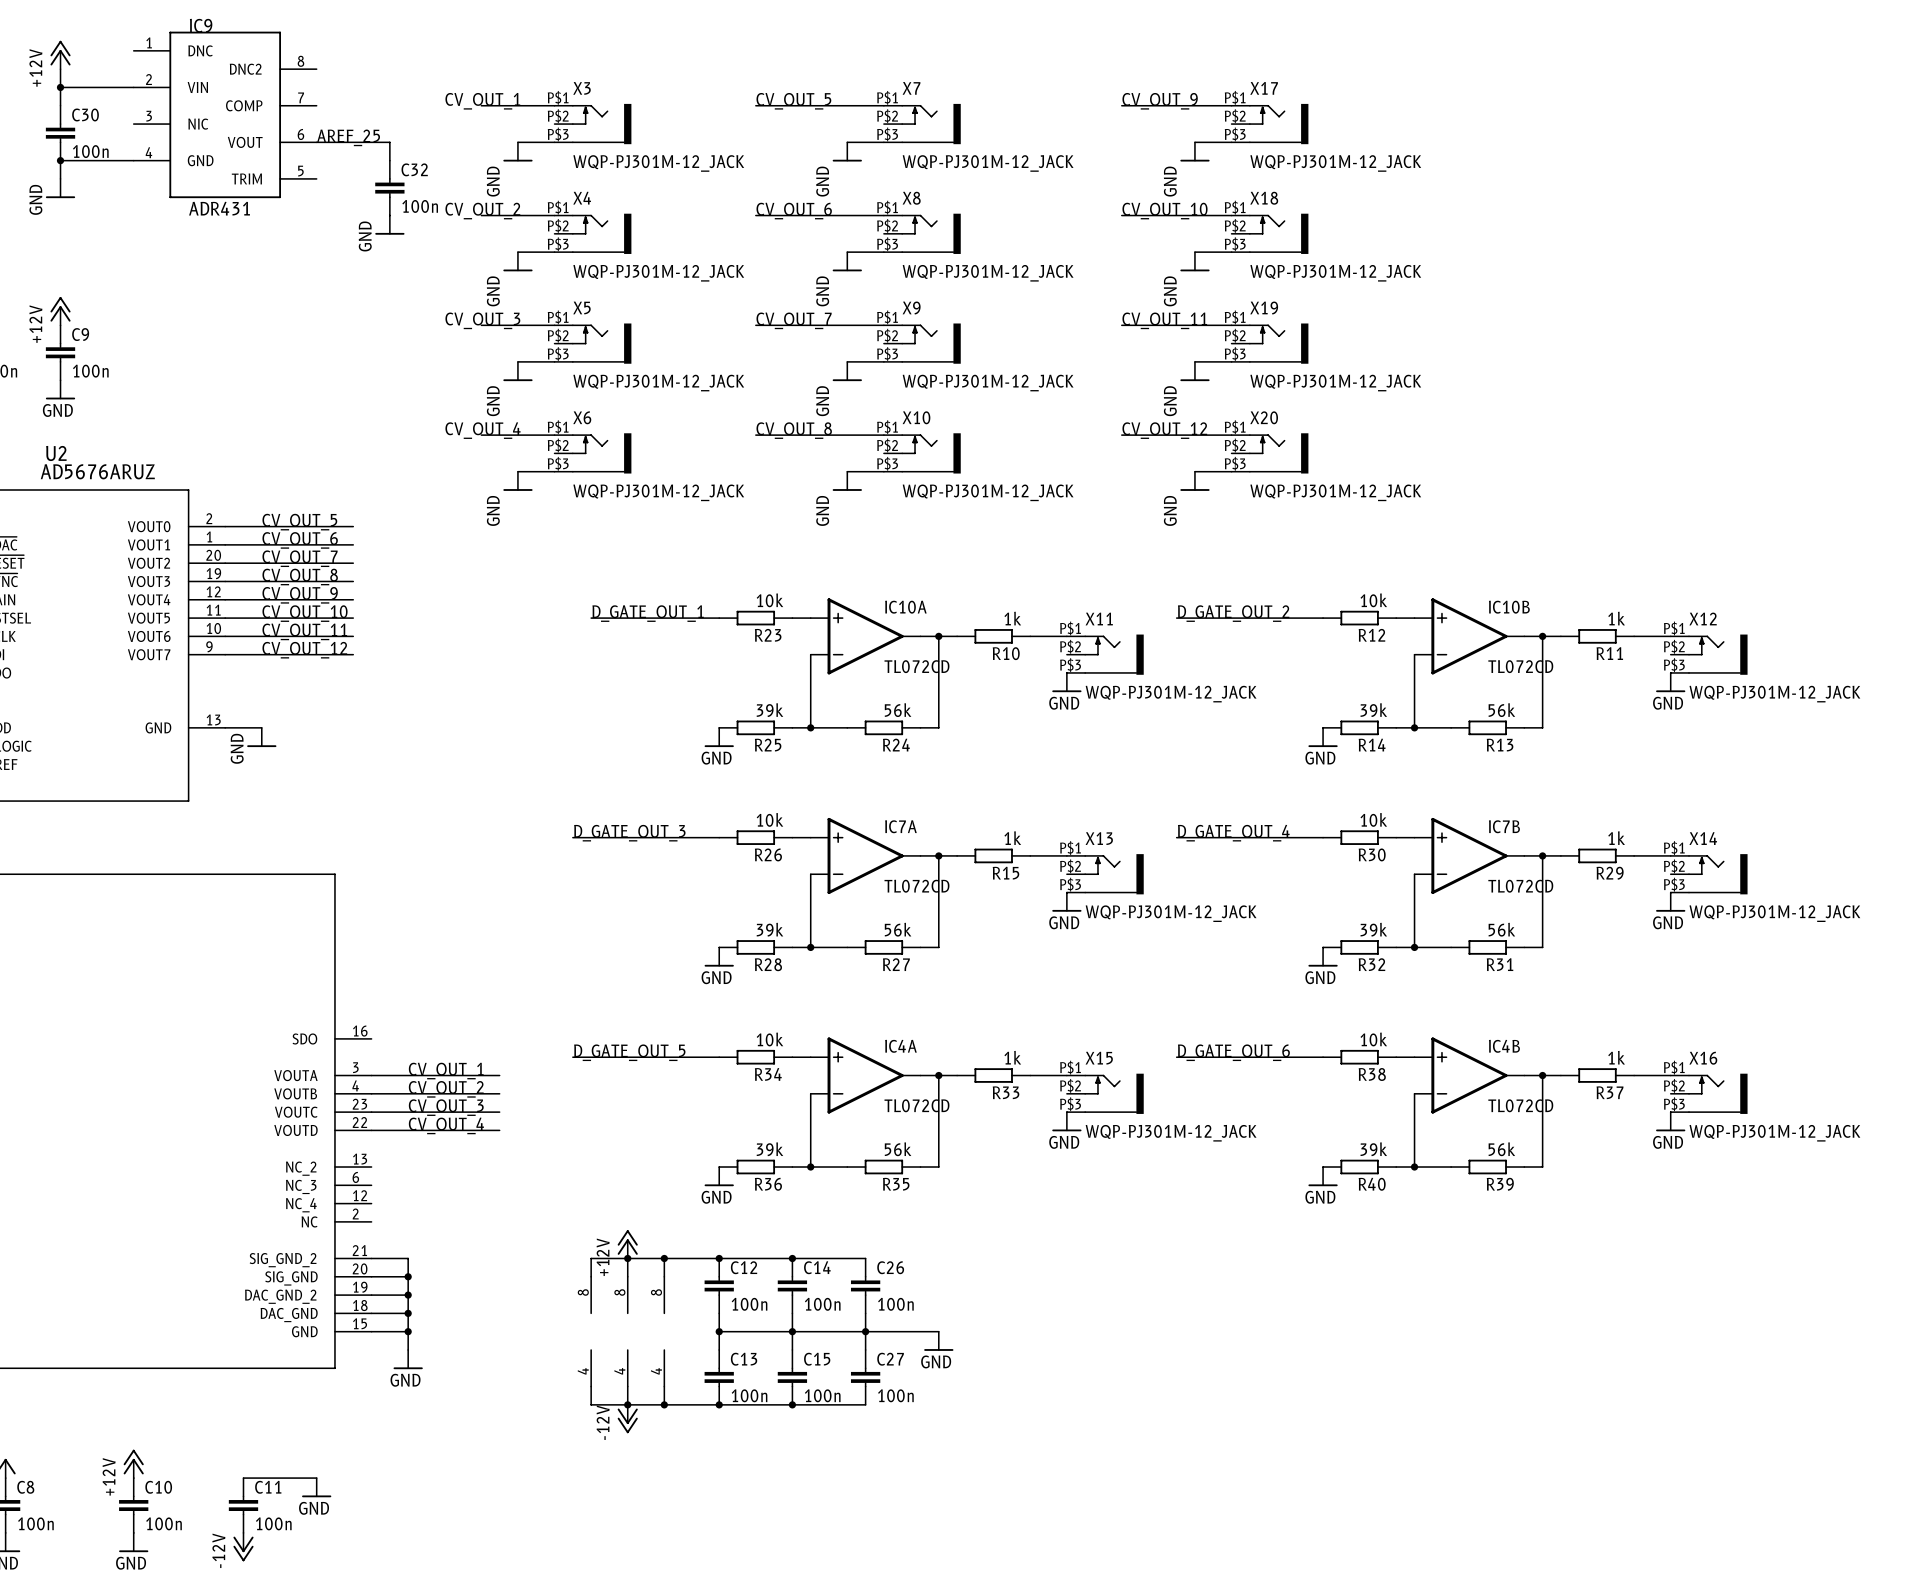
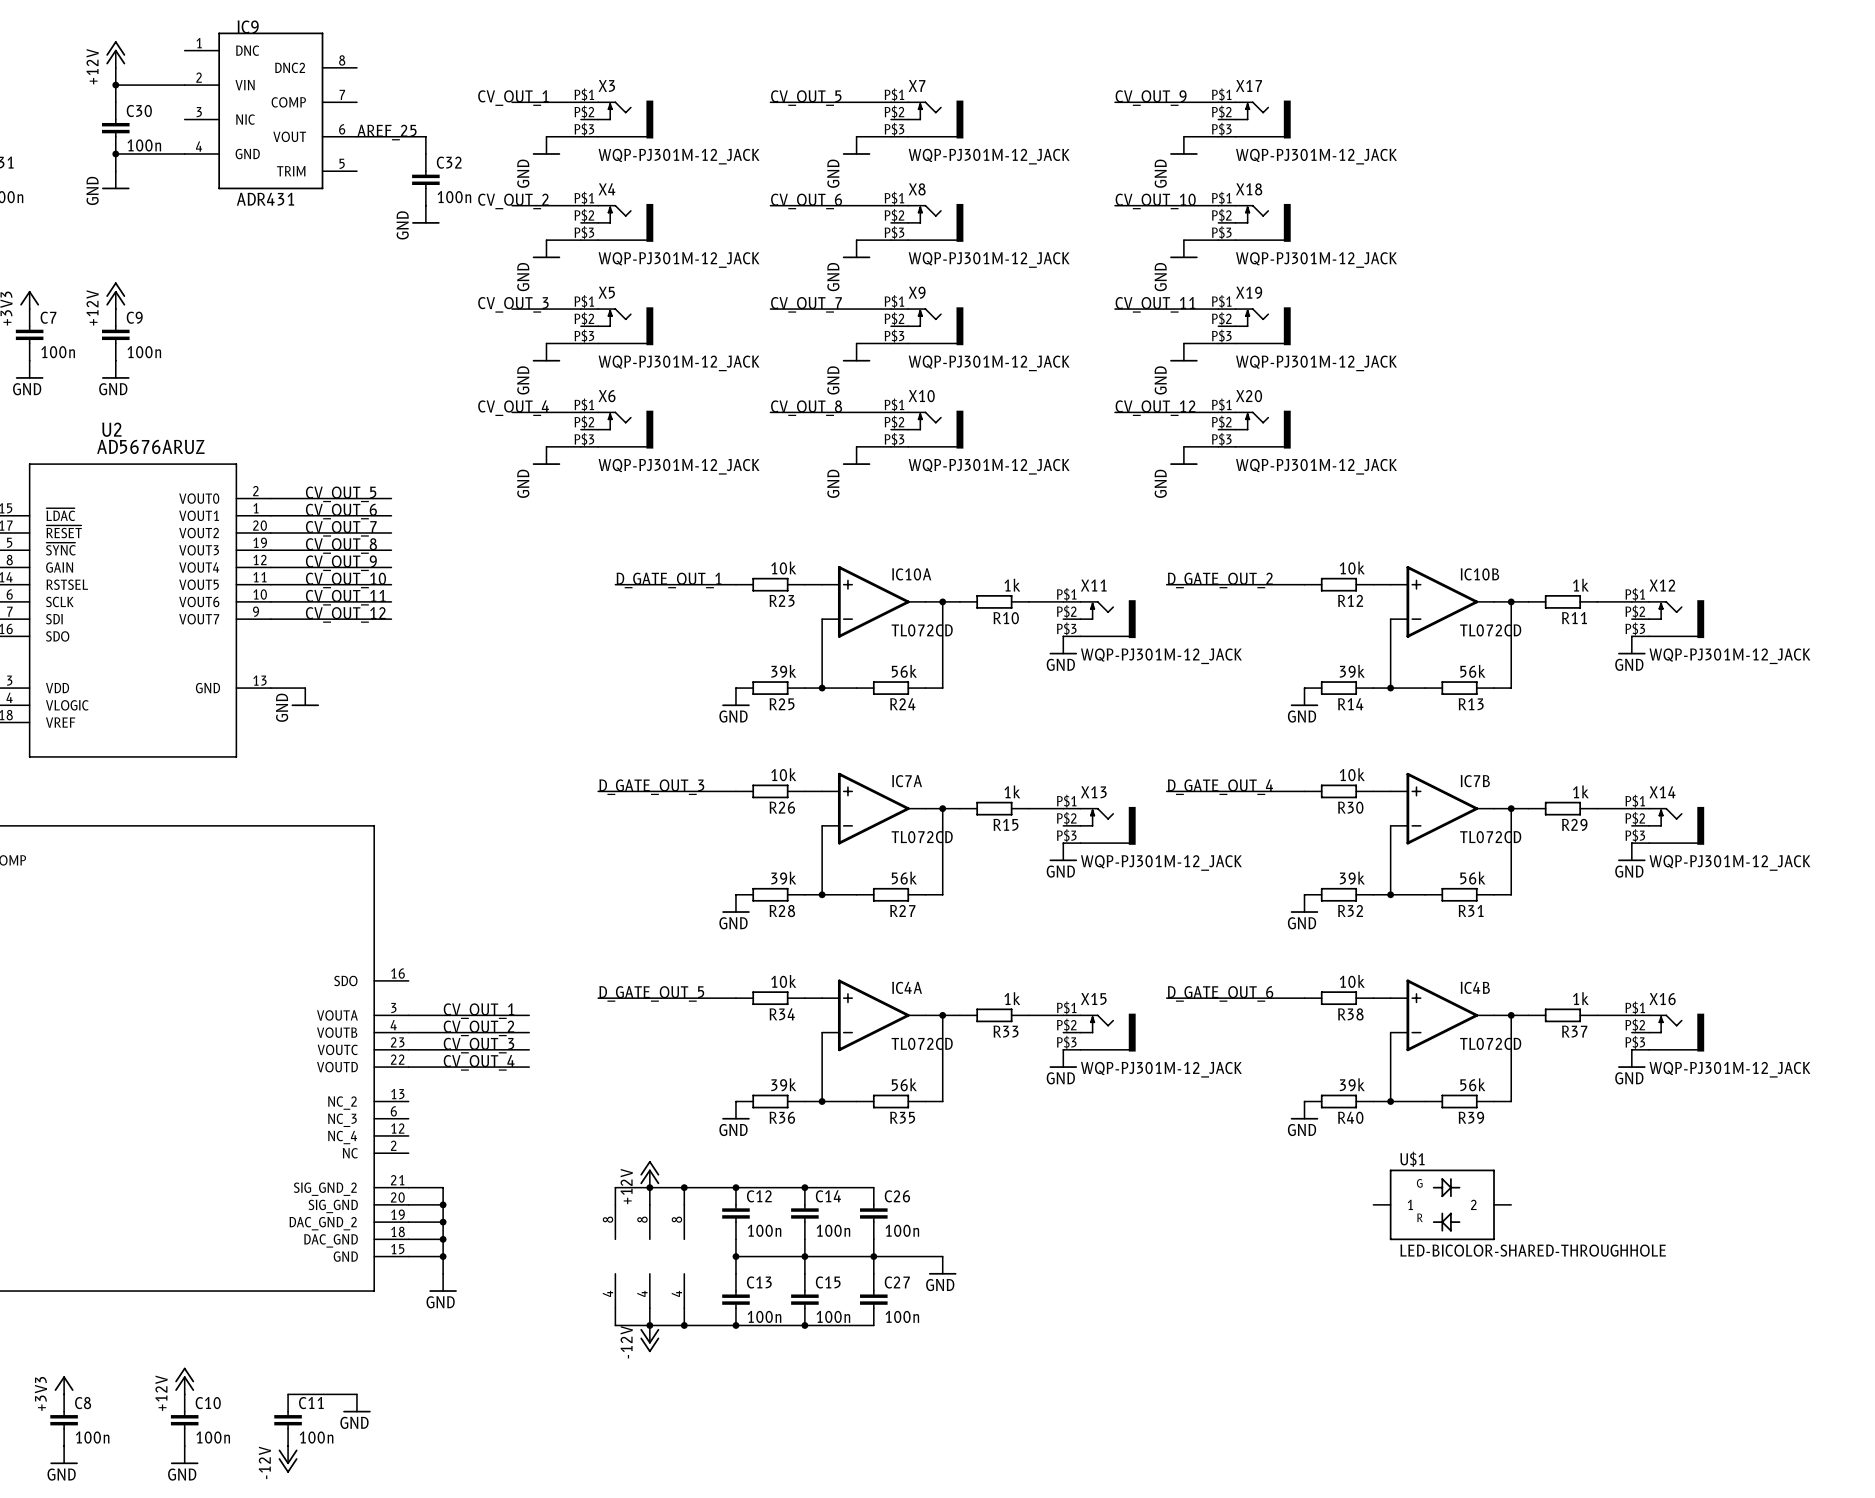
U$1: none -> LED-BICOLOR-SHARED-THROUGHHOLE (1442, 1204)

